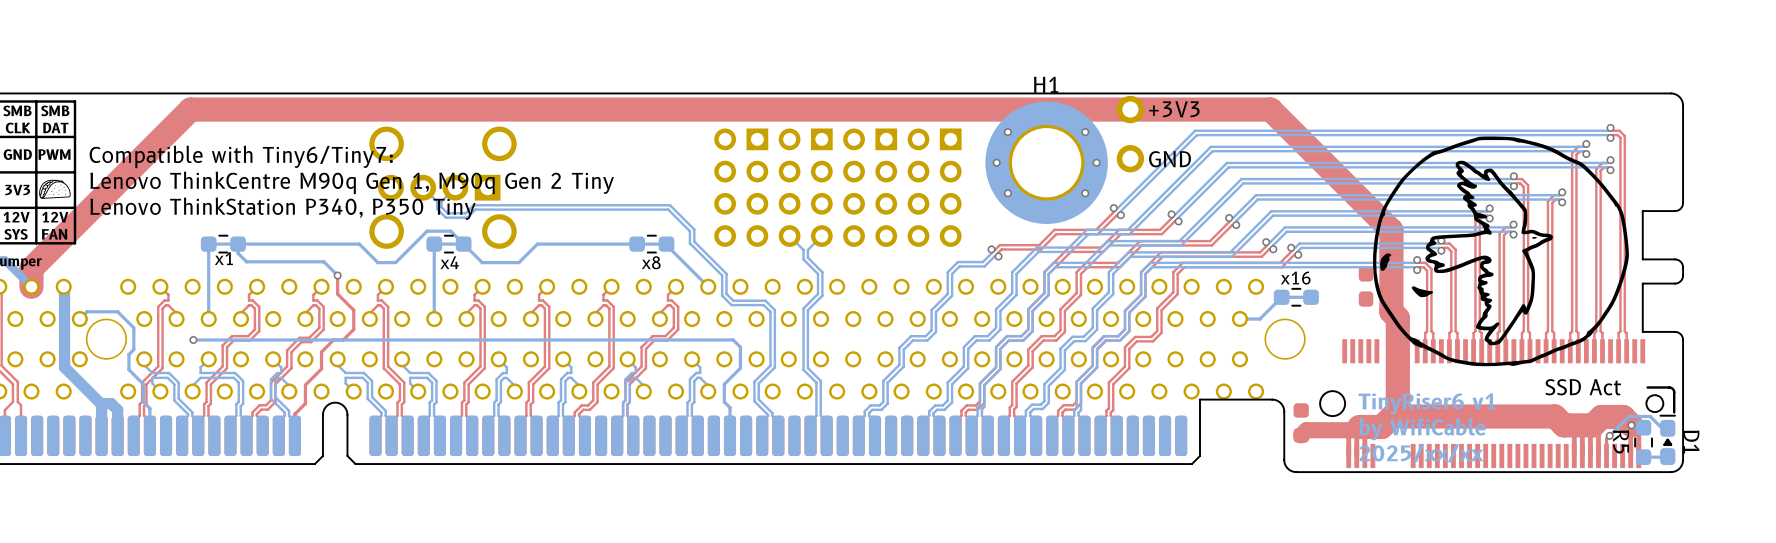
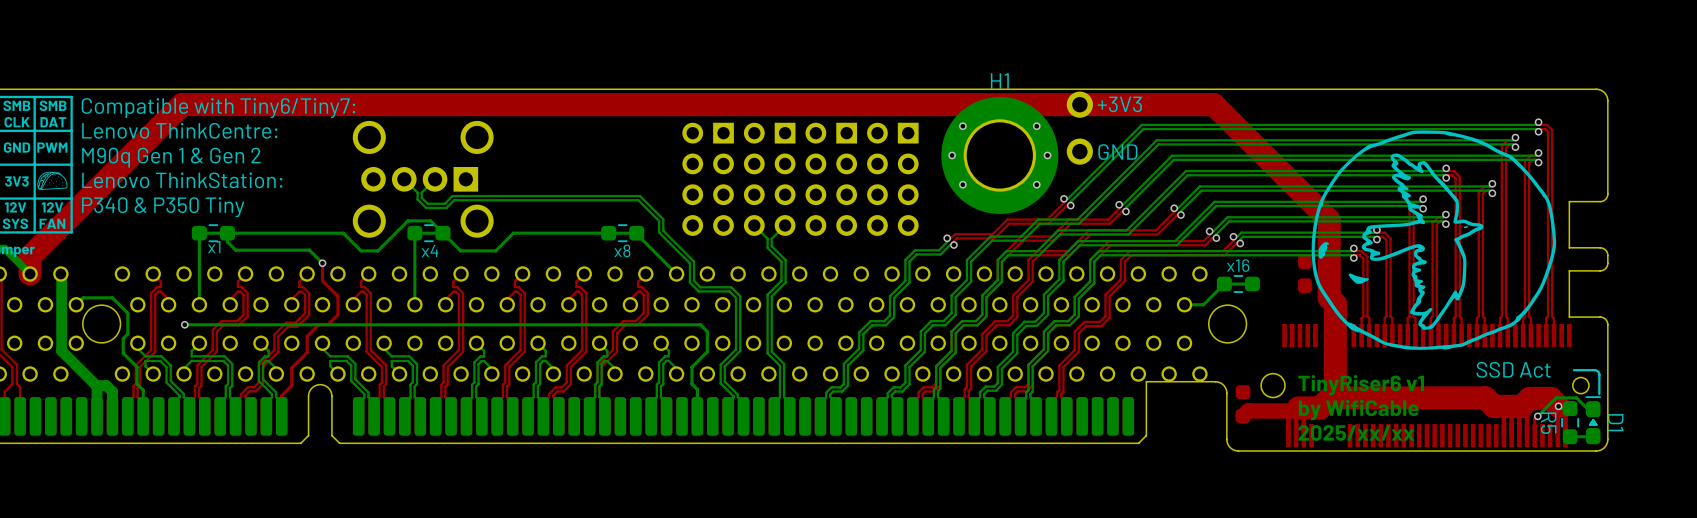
text: none -> Lenovo ThinkCentre: (179, 130)
text position: Compatible with Tiny6/Tiny7: (241, 156) -> Compatible with Tiny6/Tiny7: (218, 108)
text: none -> M90q Gen 1 & Gen 2 (171, 157)
text: Lenovo ThinkCentre M90q Gen 1, M90q Gen 2 Tiny (352, 182) -> none
text: Lenovo ThinkStation P340, P350 Tiny (283, 208) -> Lenovo ThinkStation: (182, 180)
text: none -> P340 & P350 Tiny (163, 207)

